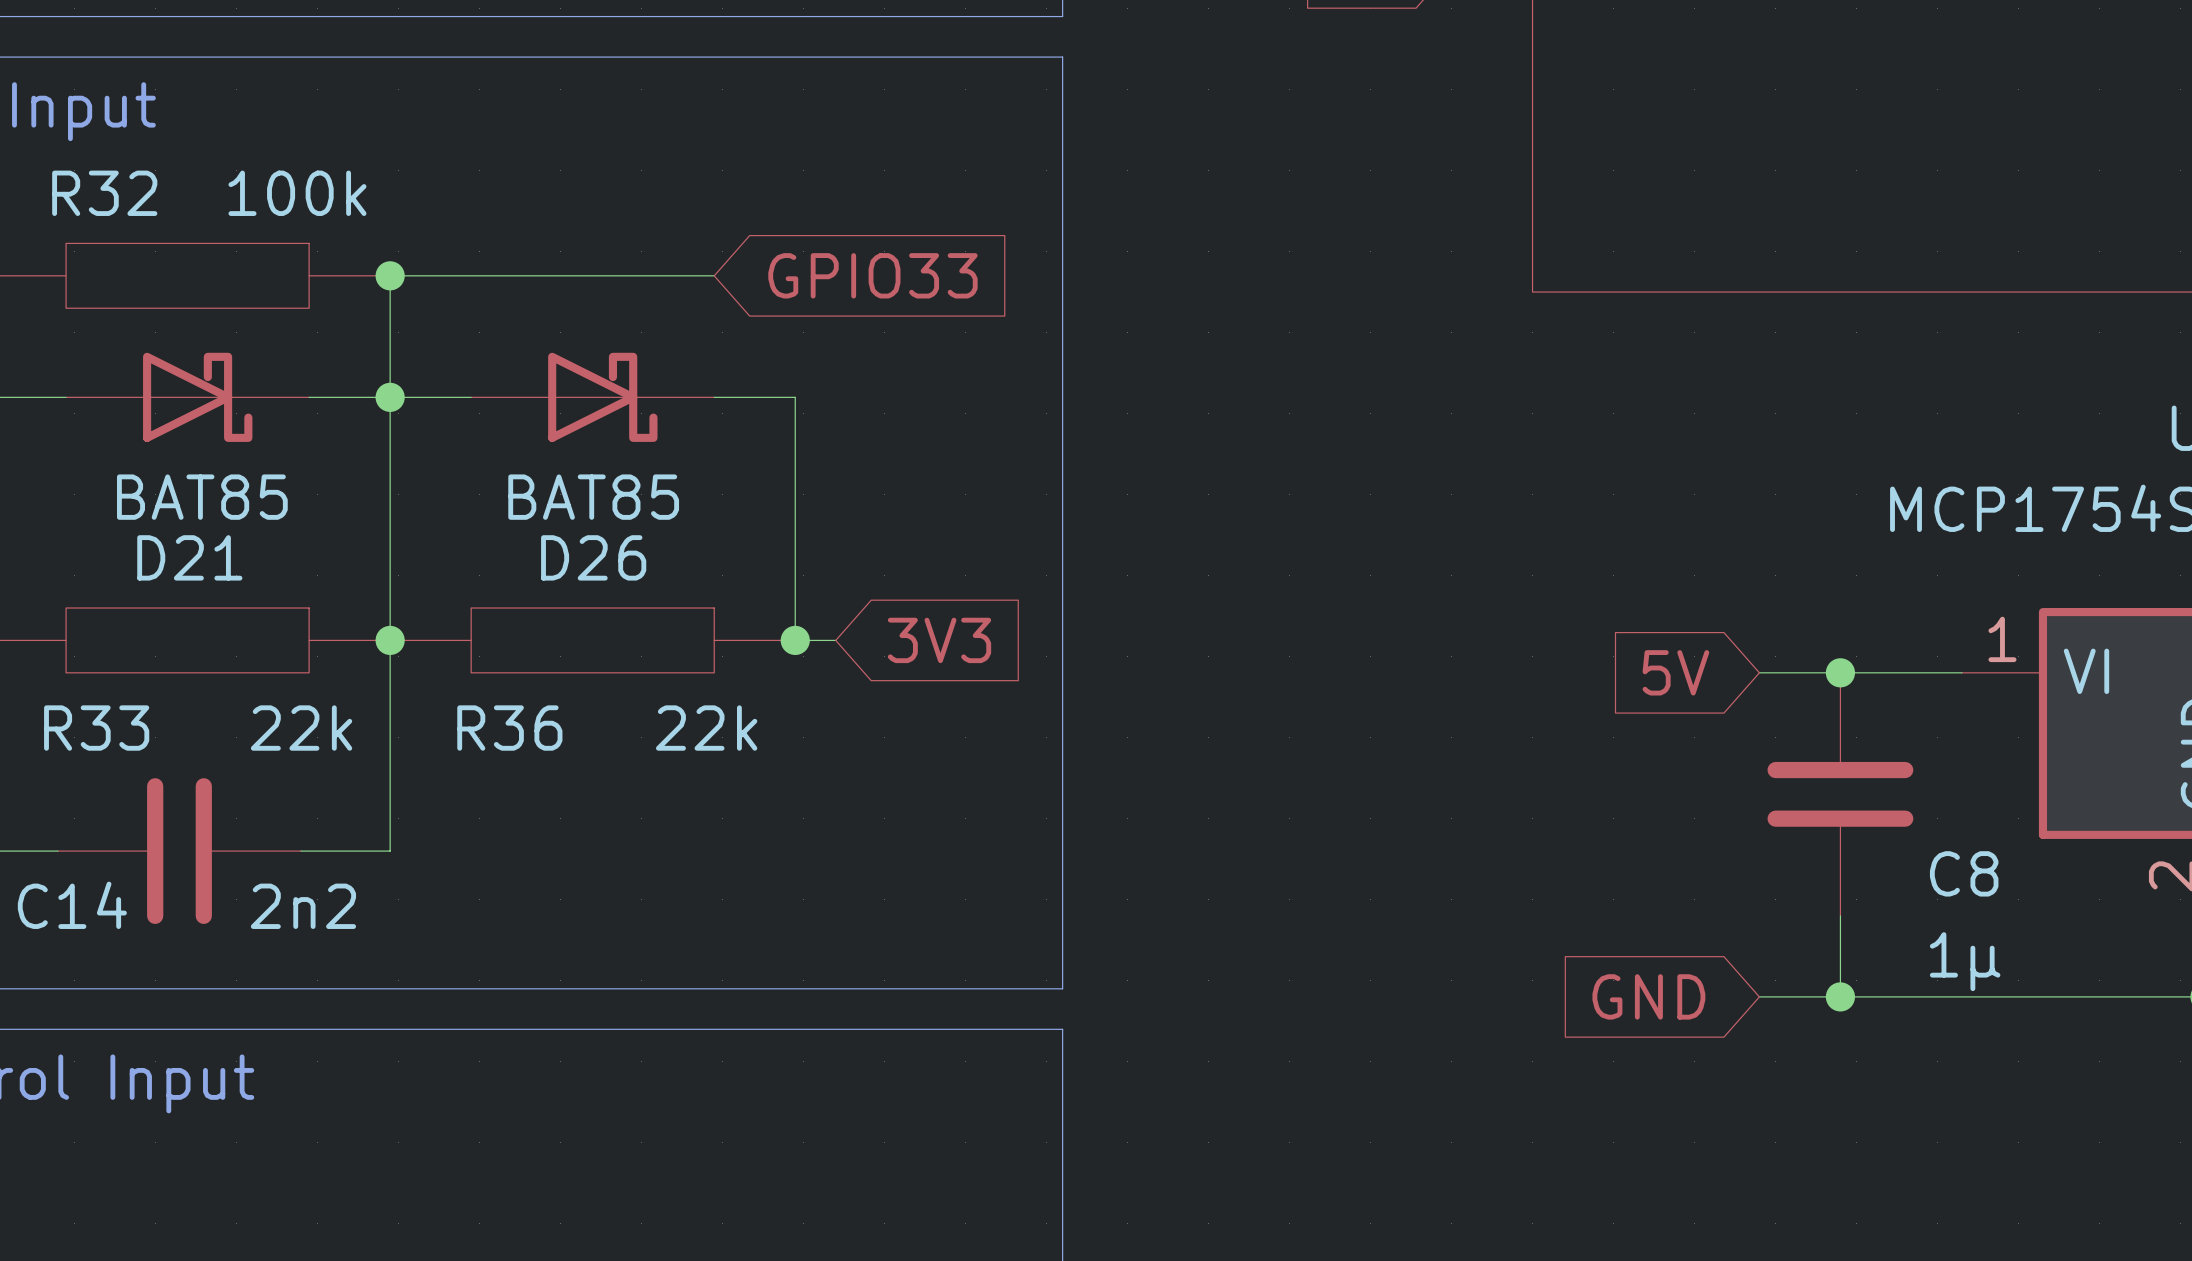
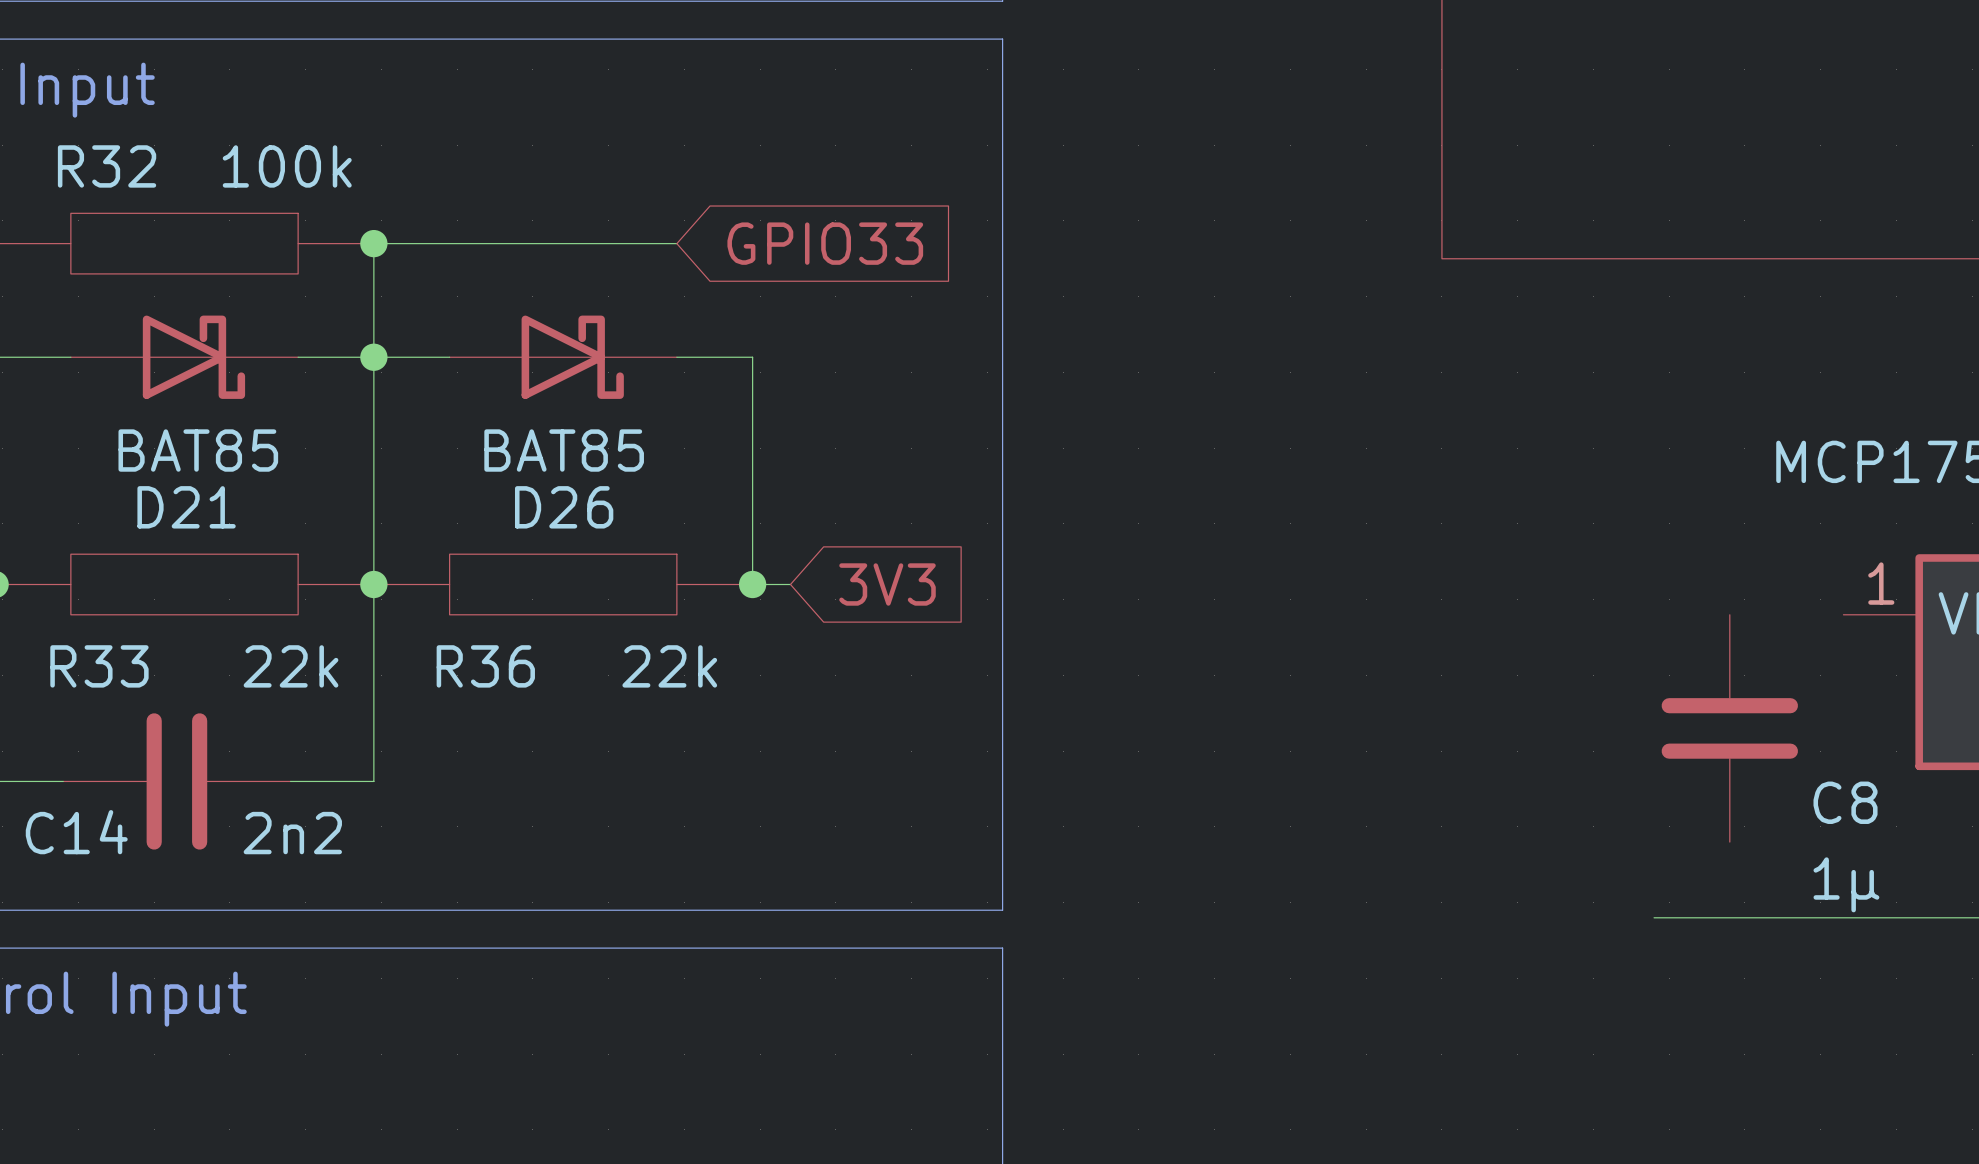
global label: 5V (1675, 672) -> none
wire: (1759, 672) (1961, 672) -> none
junction: (1840, 672) -> none
wire: (1840, 915) (1840, 996) -> none
global label: GND (1648, 996) -> none
junction: (1840, 996) -> none

